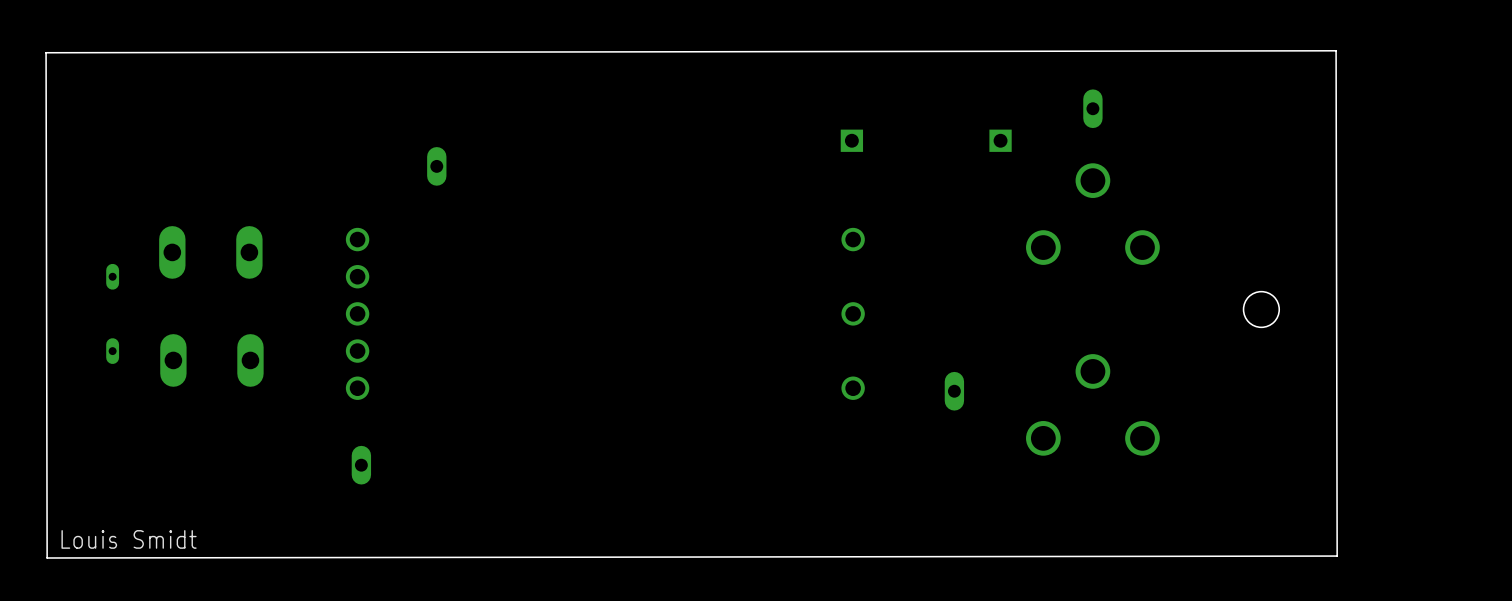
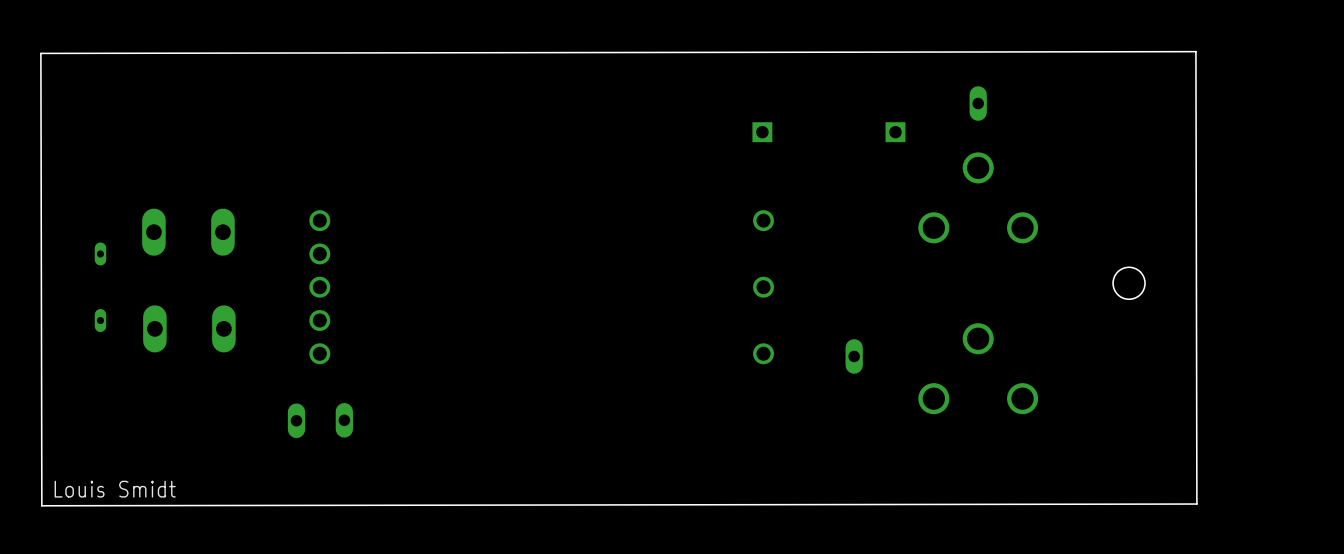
part: (436, 166) -> none
part: none -> (344, 420)
part: none -> (296, 420)
part: (361, 465) -> none

